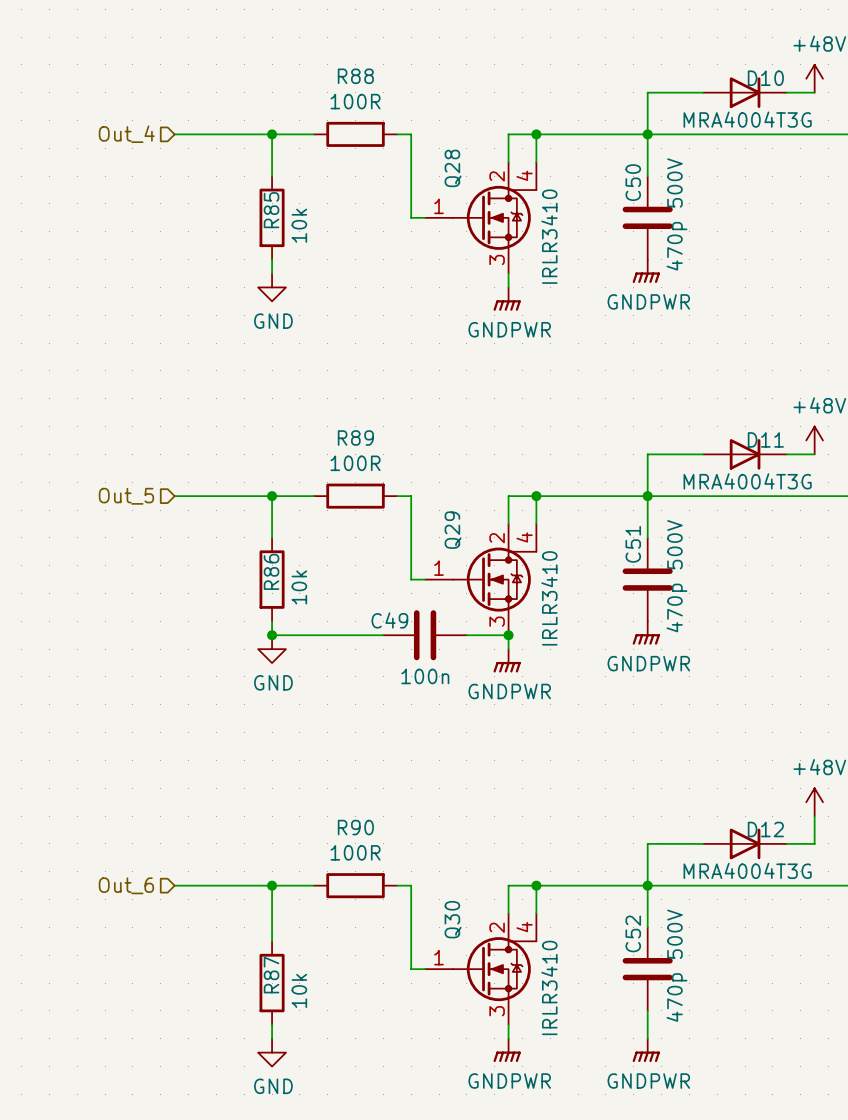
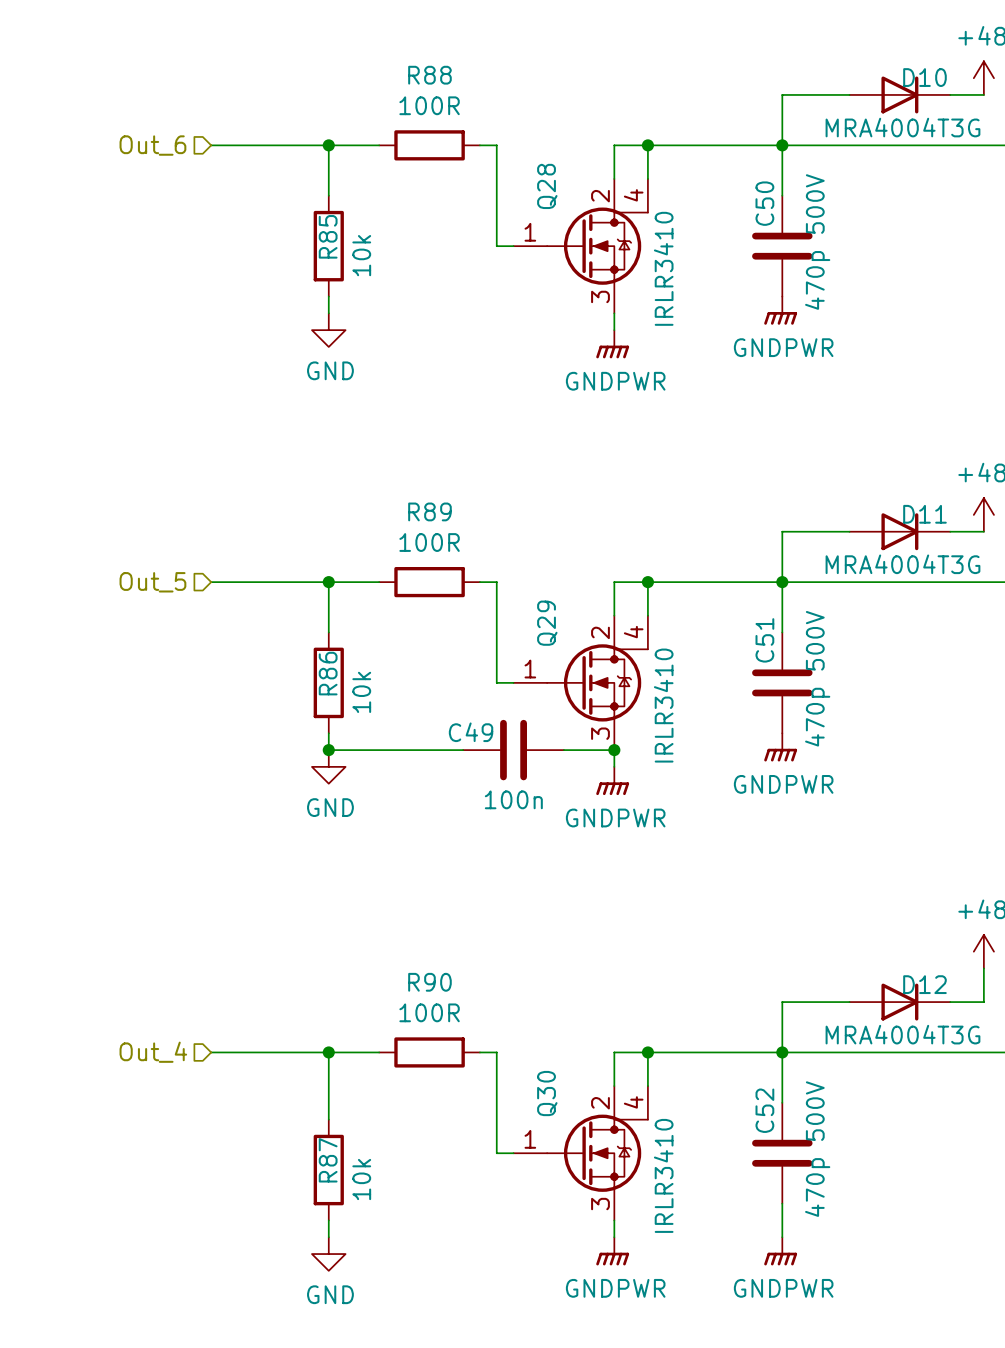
hierarchical label: Out_4 (126, 134) -> Out_6 (152, 145)
hierarchical label: Out_6 (126, 885) -> Out_4 (153, 1052)

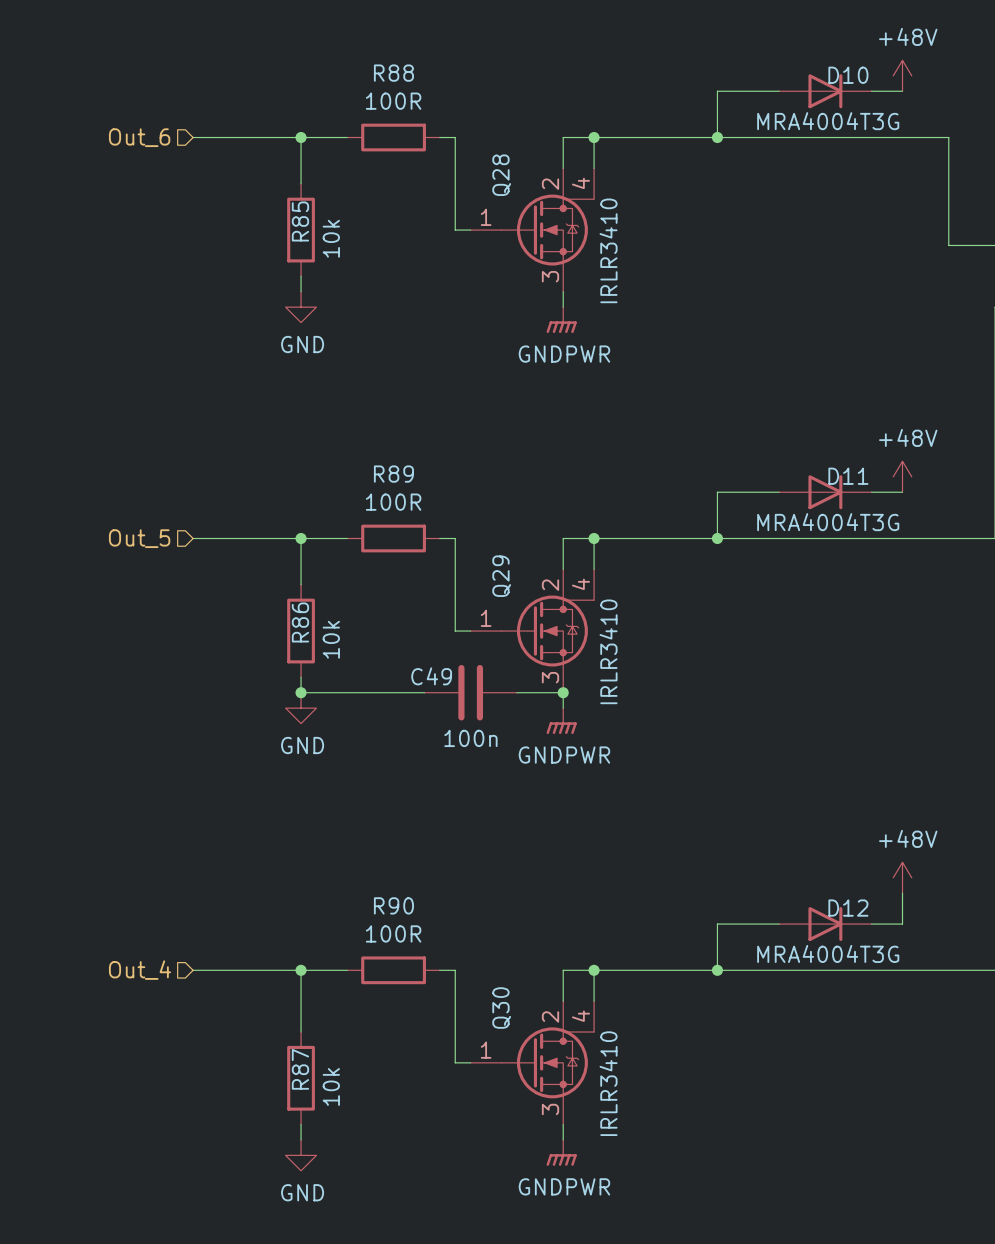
wire: (782, 145) (782, 195) -> none
C50: 470p 500V (782, 246) -> none
power symbol: GNDPWR (780, 310) -> none
wire: (782, 582) (782, 632) -> none
C51: 470p 500V (782, 682) -> none
power symbol: GNDPWR (780, 747) -> none
wire: (782, 1052) (782, 1102) -> none
C52: 470p 500V (782, 1153) -> none
wire: (782, 1203) (782, 1237) -> none
power symbol: GNDPWR (780, 1251) -> none

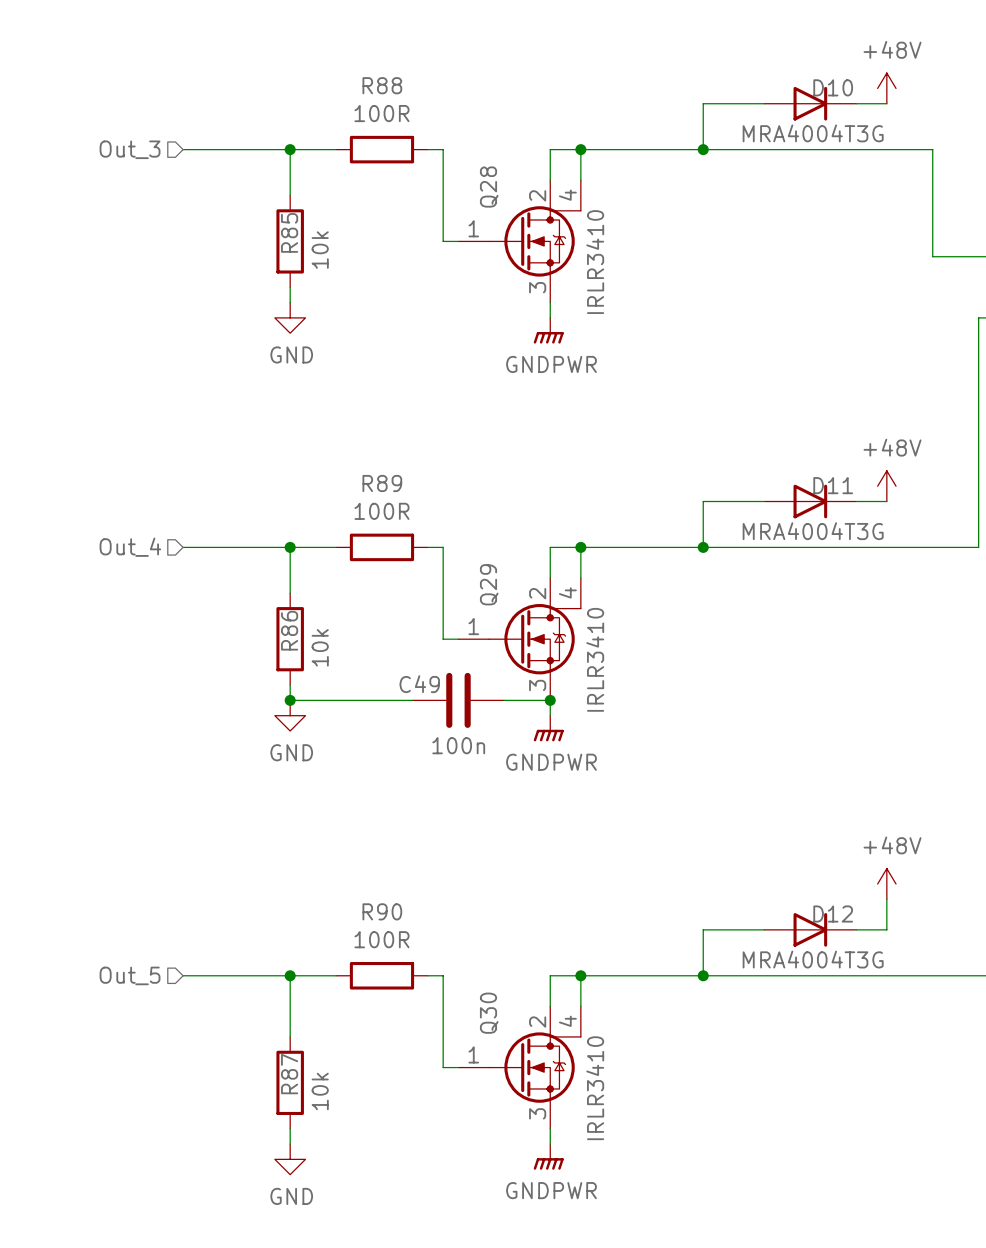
hierarchical label: Out_6 (139, 137) -> Out_3 (130, 149)
hierarchical label: Out_5 (139, 538) -> Out_4 (130, 547)
hierarchical label: Out_4 (139, 970) -> Out_5 (130, 975)

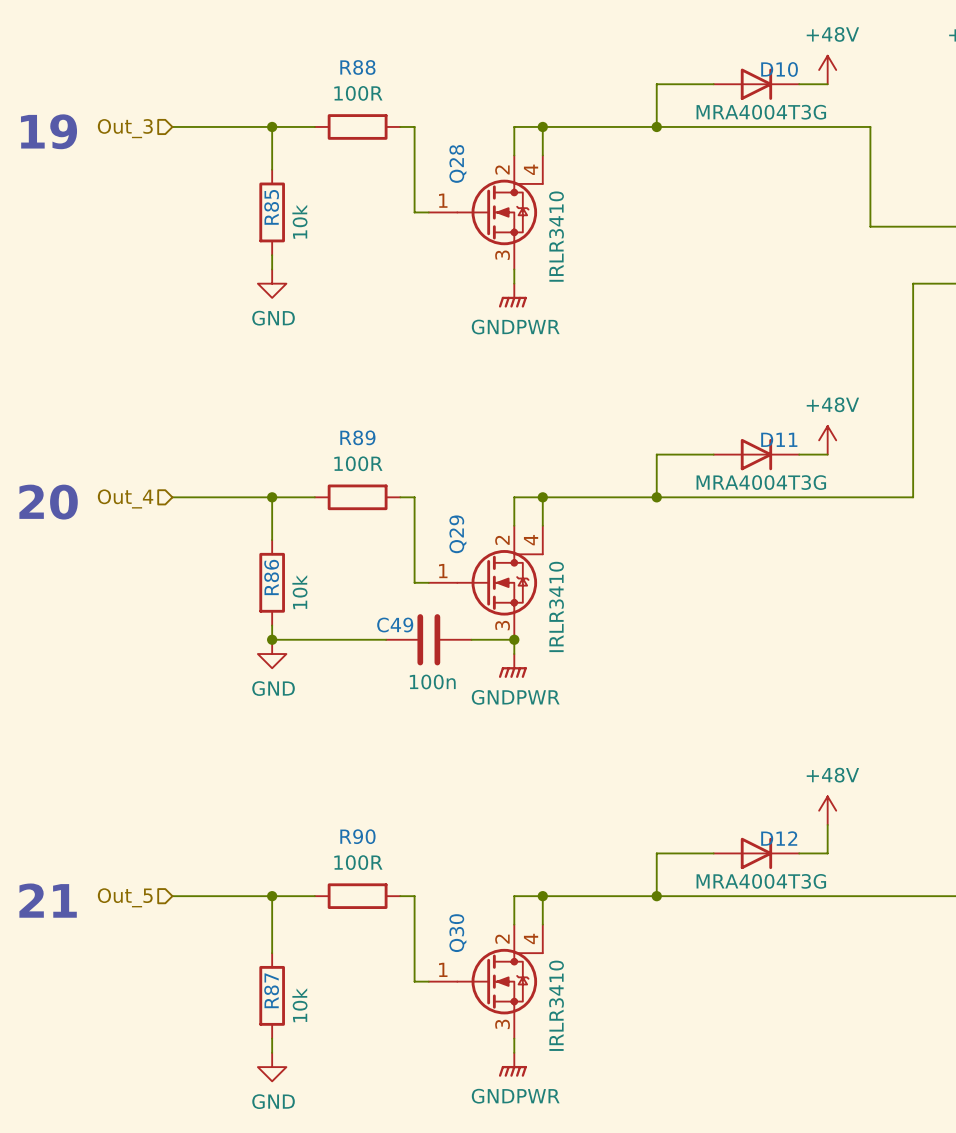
text: none -> 19 (48, 131)
text: none -> 20 (48, 502)
text: none -> 21 (48, 900)

